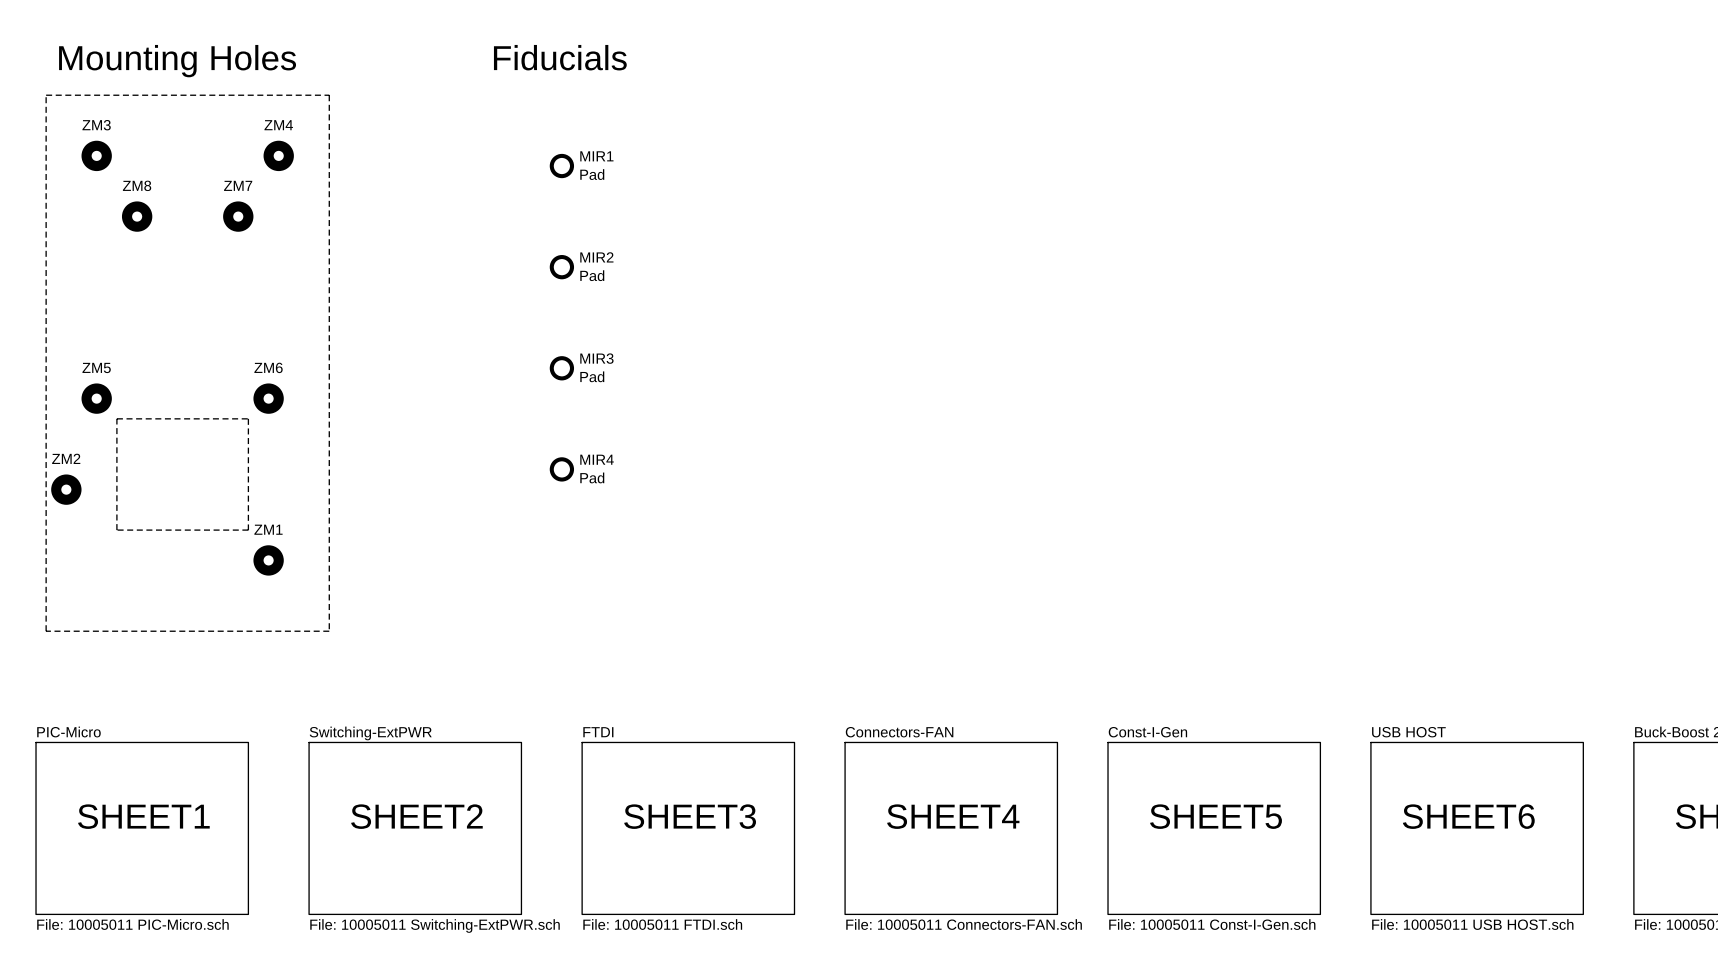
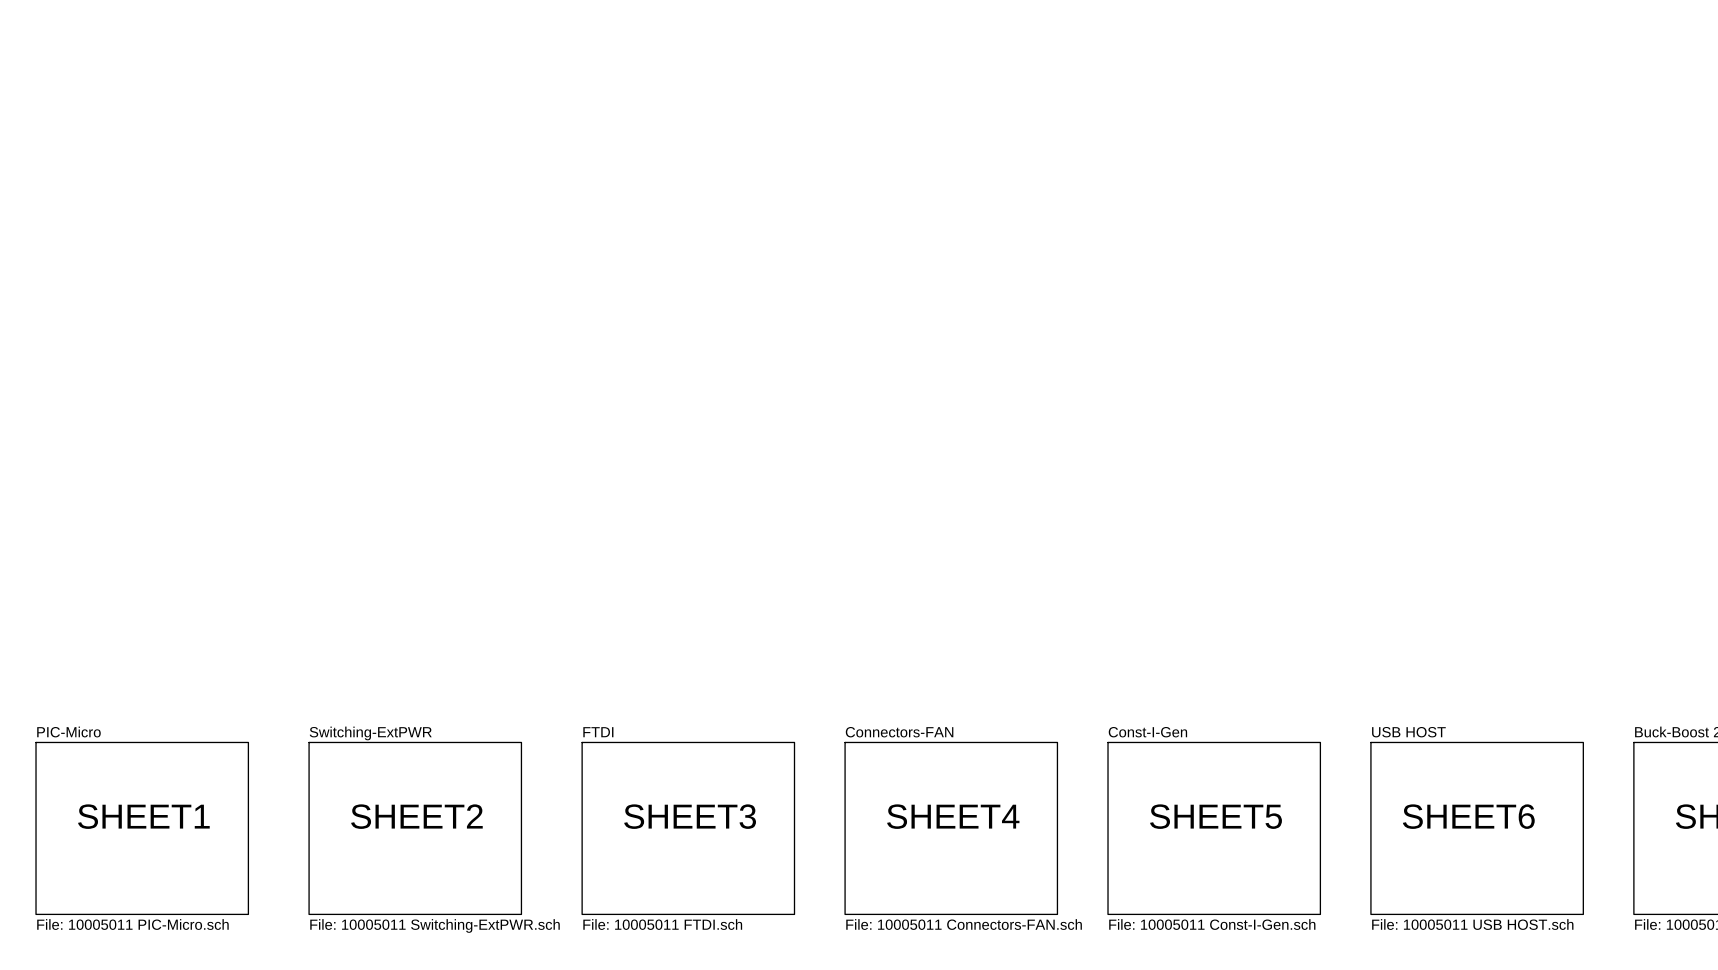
text: Fiducials (560, 57) -> none
text: Mounting Holes (177, 61) -> none
line: (46, 95) (329, 95) (329, 631) (46, 631) (46, 95) -> none
ZM3: (96, 155) -> none
ZM4: (278, 155) -> none
MIR1: Pad (561, 166) -> none
ZM8: (137, 216) -> none
ZM7: (238, 216) -> none
MIR2: Pad (561, 267) -> none
MIR3: Pad (561, 368) -> none
ZM5: (96, 398) -> none
ZM6: (268, 398) -> none
line: (116, 418) (248, 418) (248, 530) (116, 530) (116, 418) -> none
MIR4: Pad (561, 469) -> none
ZM2: (66, 489) -> none
ZM1: (268, 560) -> none

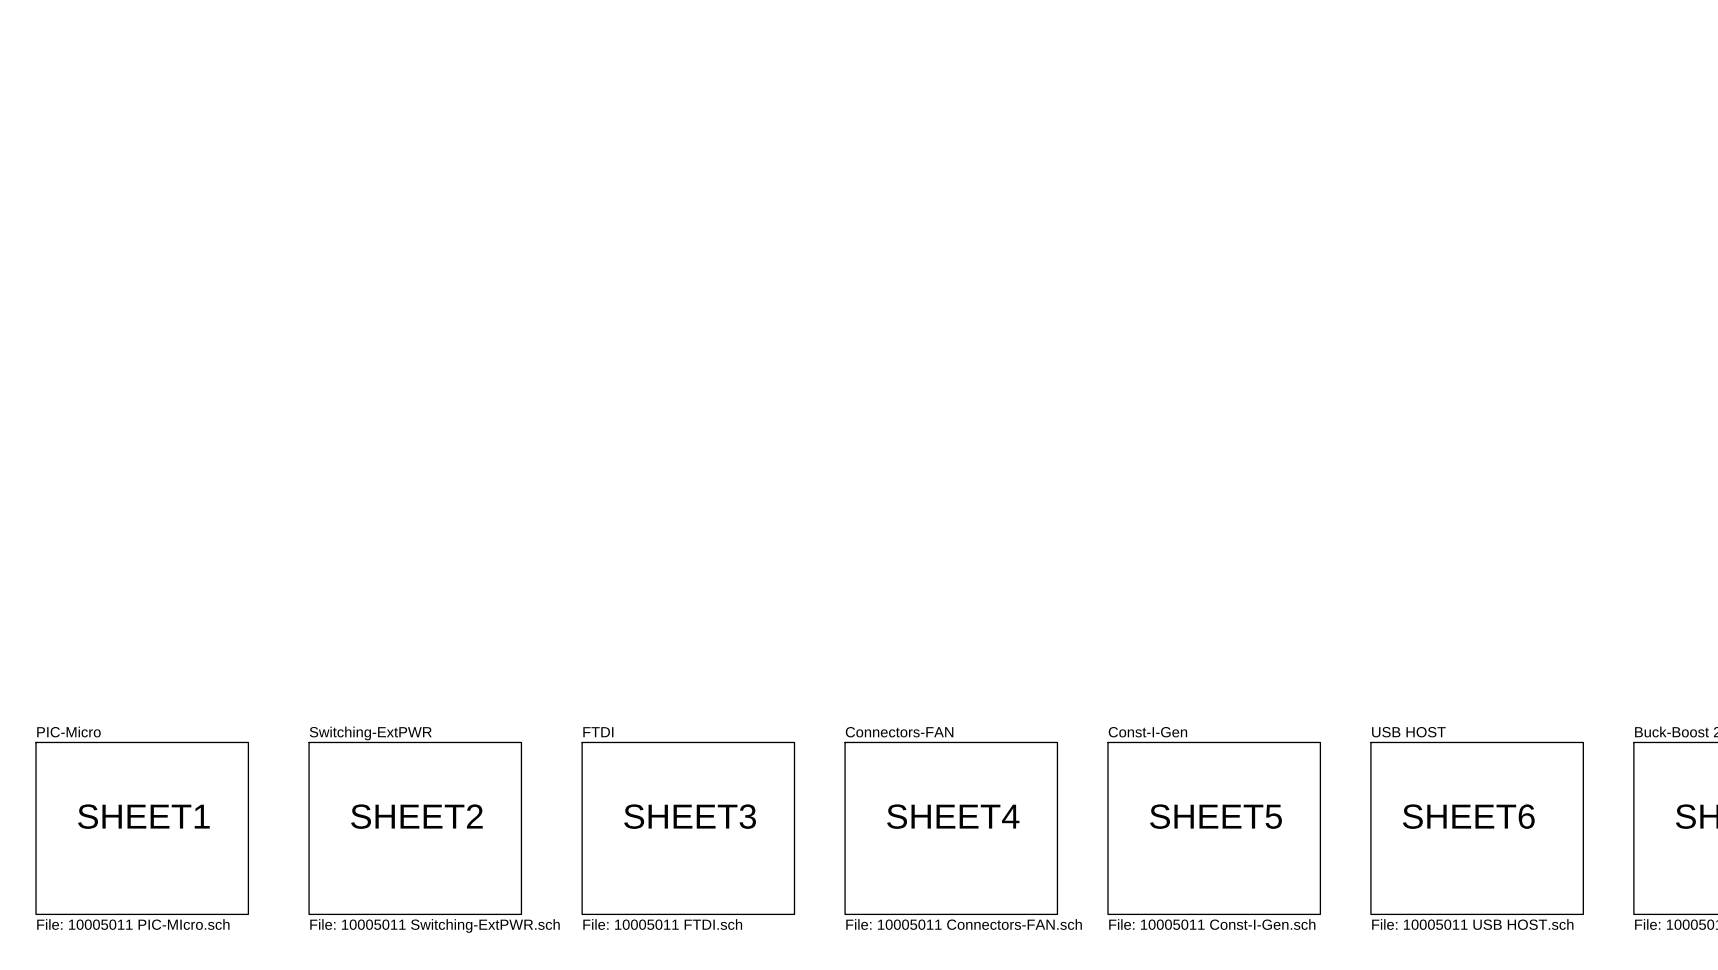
sheet PIC-Micro value: File: 10005011 PIC-Micro.sch (132, 924) -> File: 10005011 PIC-MIcro.sch (133, 924)

